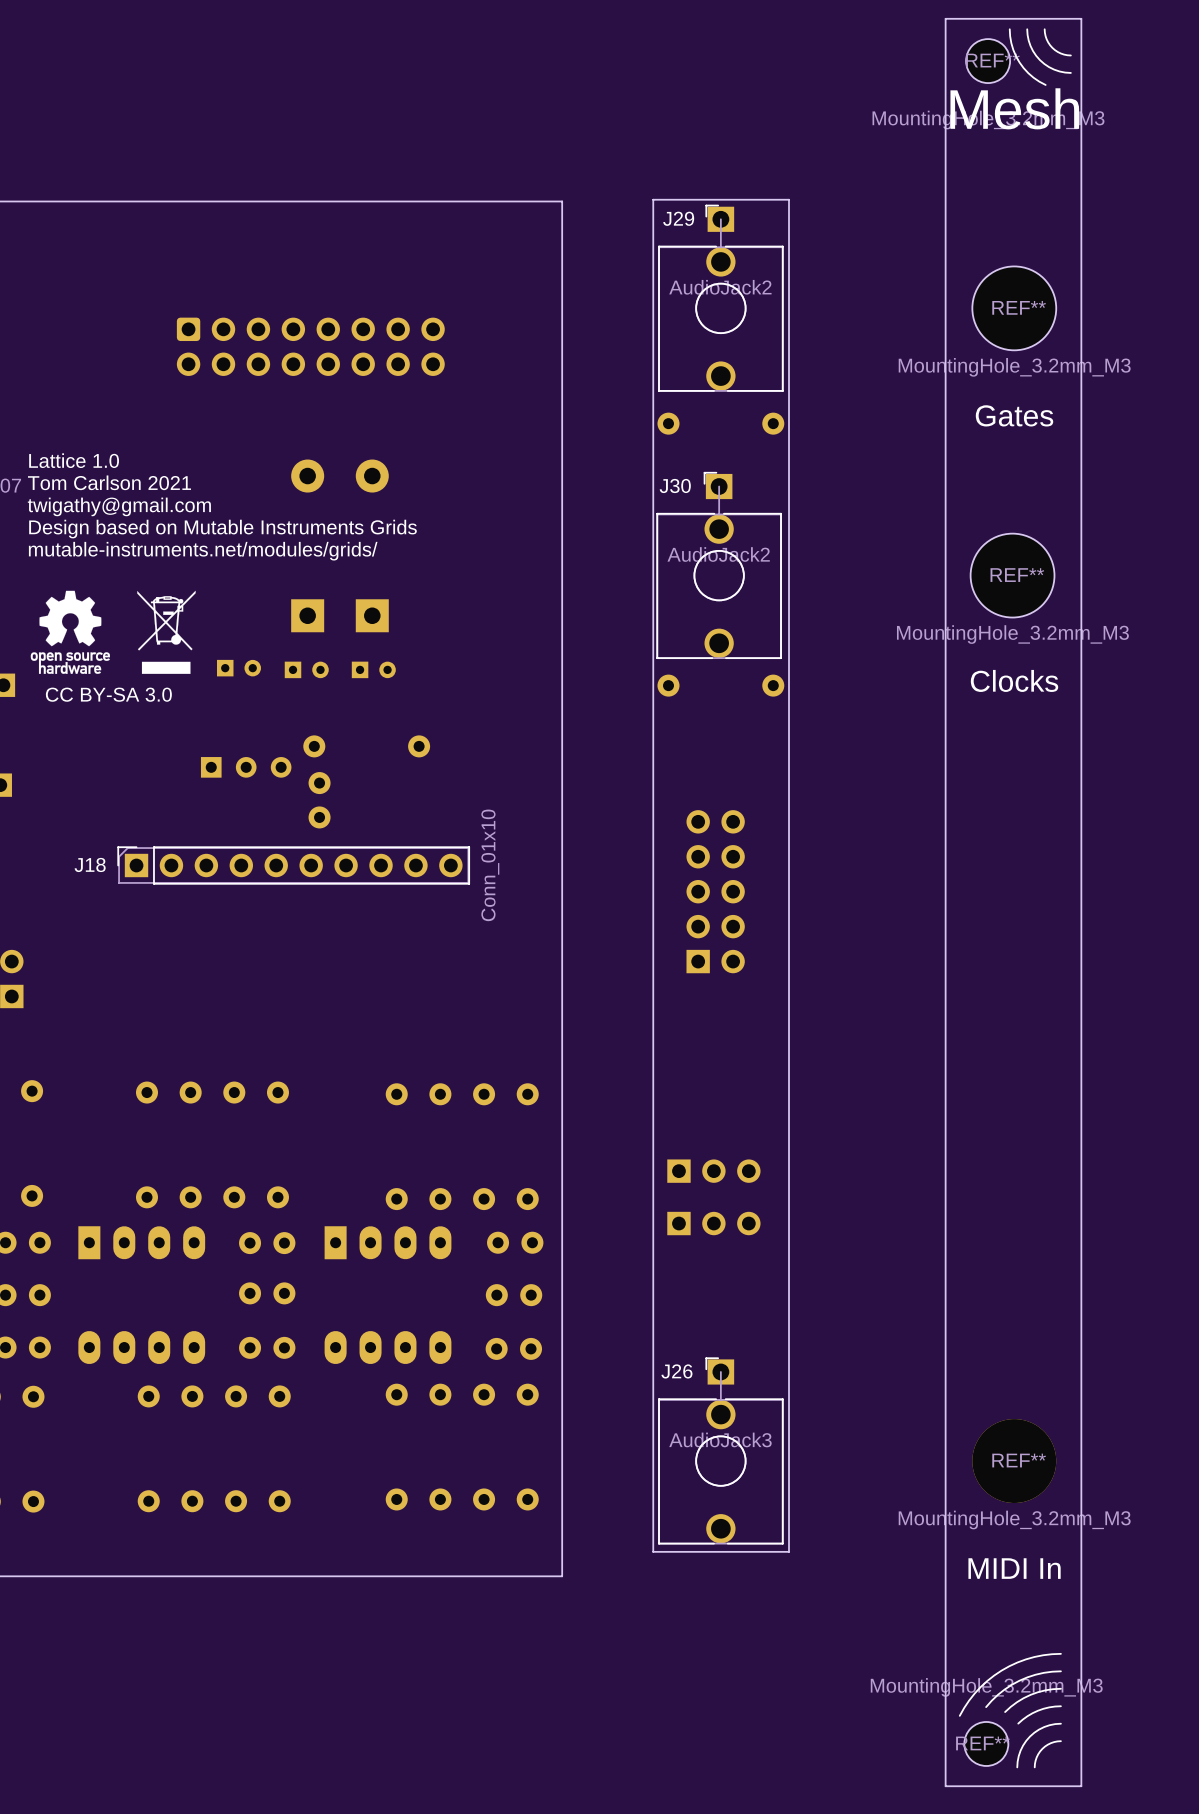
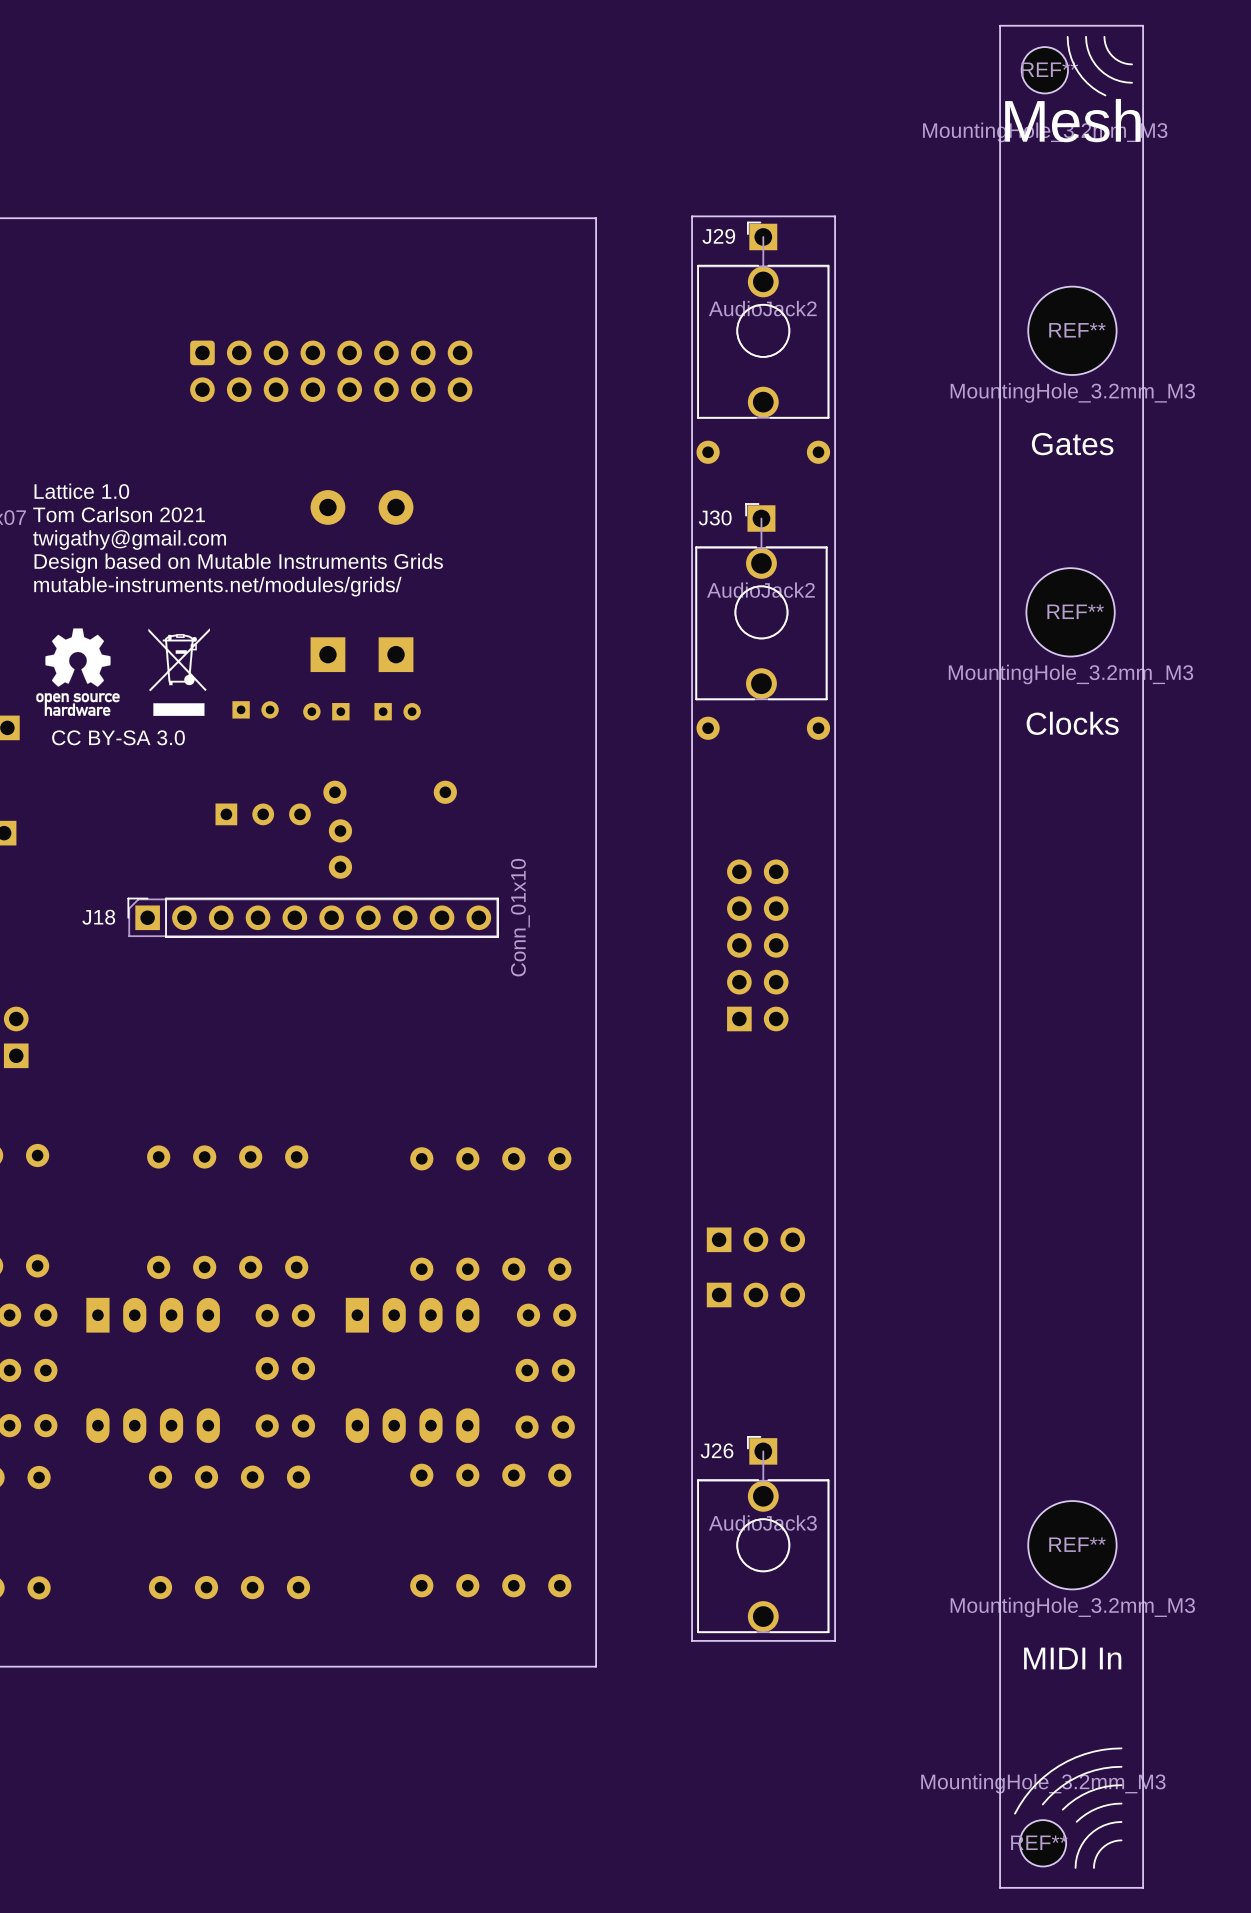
part rotation: 0° (306, 669) -> 180° (326, 711)
REF** footprint: [972, 1419, 1057, 1503] -> [1028, 1501, 1117, 1590]

